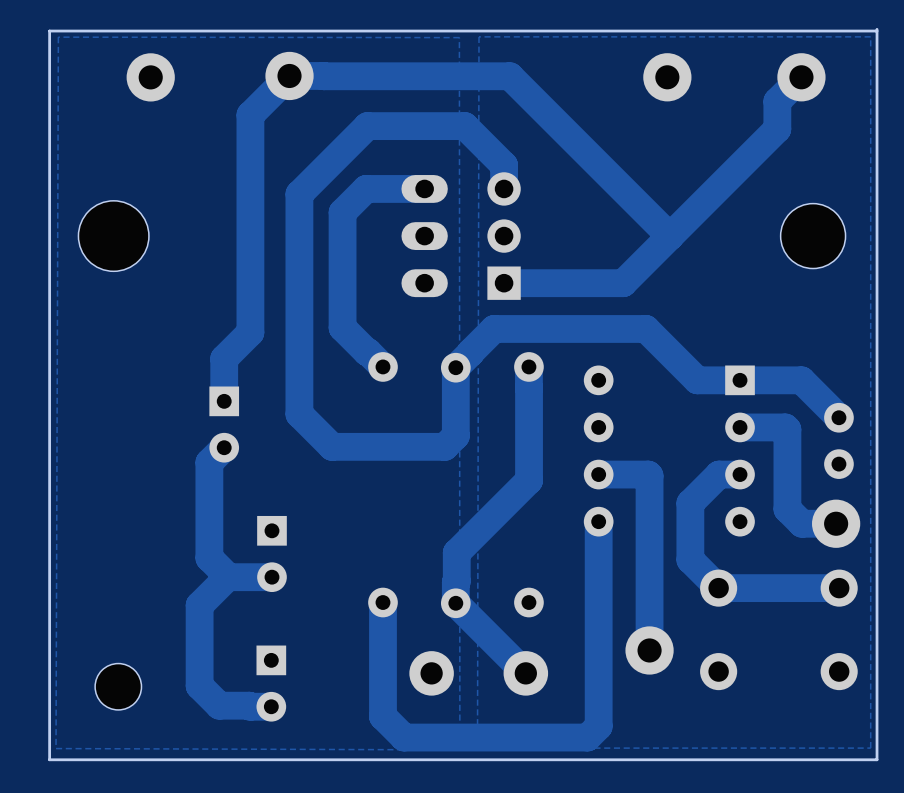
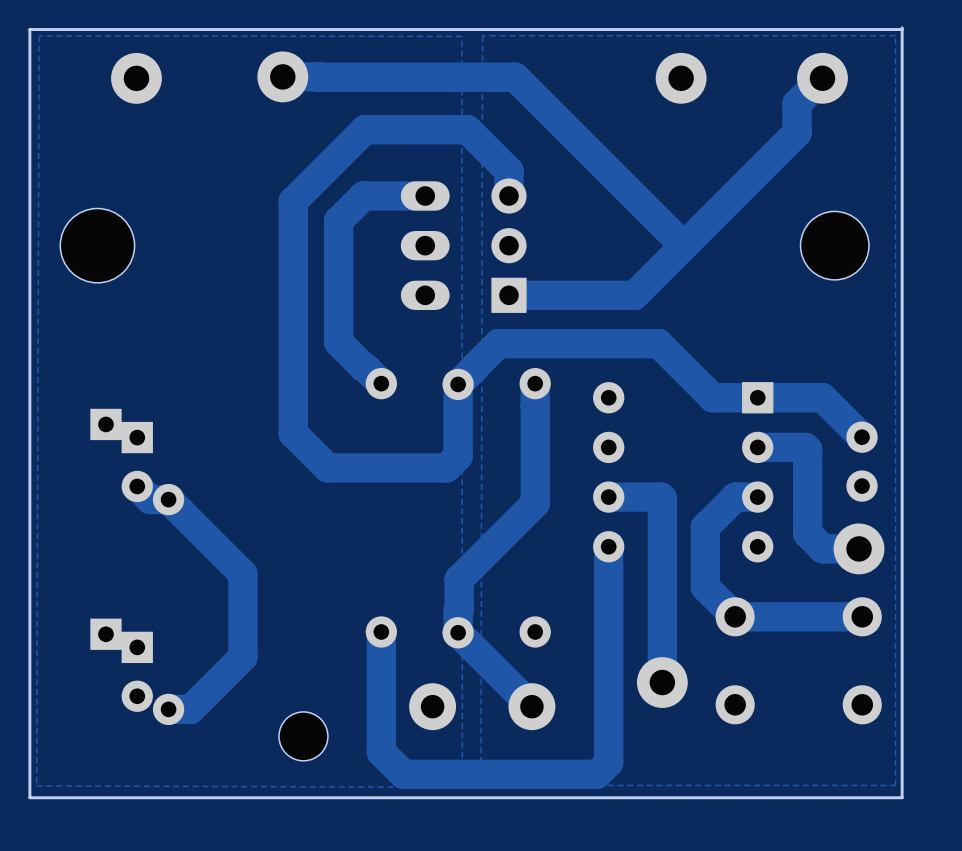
track: (289, 75) (250, 115) (250, 332) (224, 358) (224, 401) -> none
part: (224, 424) -> none
part: none -> (137, 462)
track: (224, 447) (209, 462) (209, 558) (228, 577) (271, 577) -> none
track: none -> (137, 486) (150, 499) (168, 499) (242, 573) (242, 657) (190, 709) (168, 709)
part: (271, 553) -> none
track: (228, 576) (199, 605) (199, 685) (219, 705) (271, 706) -> none
part: none -> (137, 671)
part: (271, 683) -> none
part position: (118, 686) -> (303, 736)

